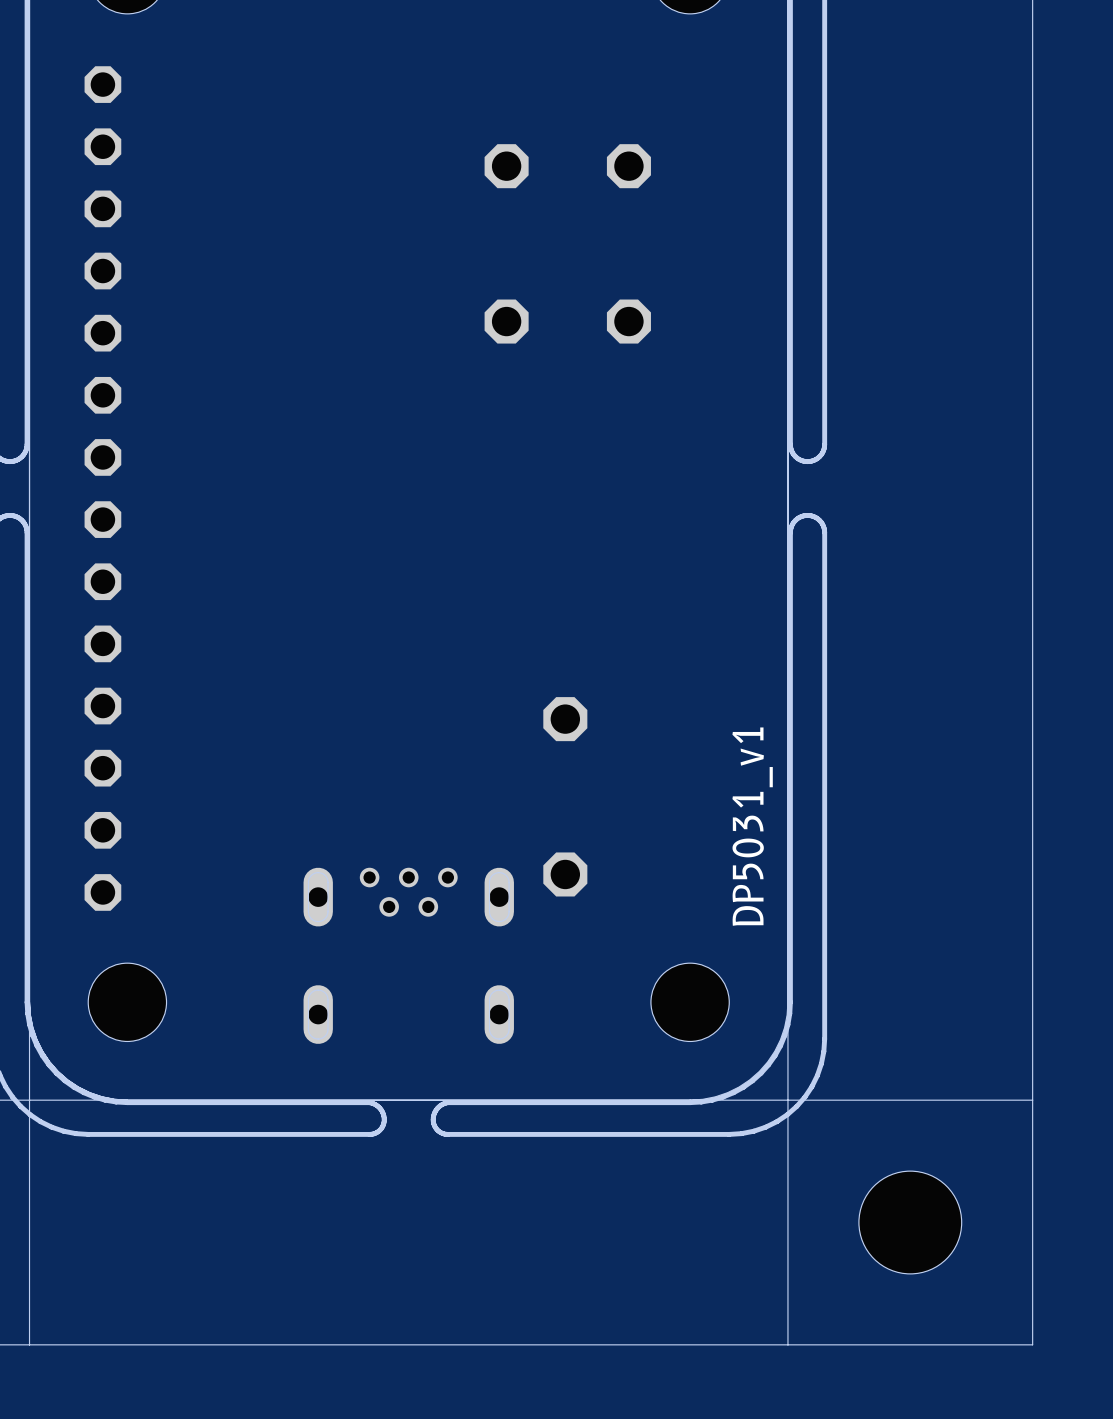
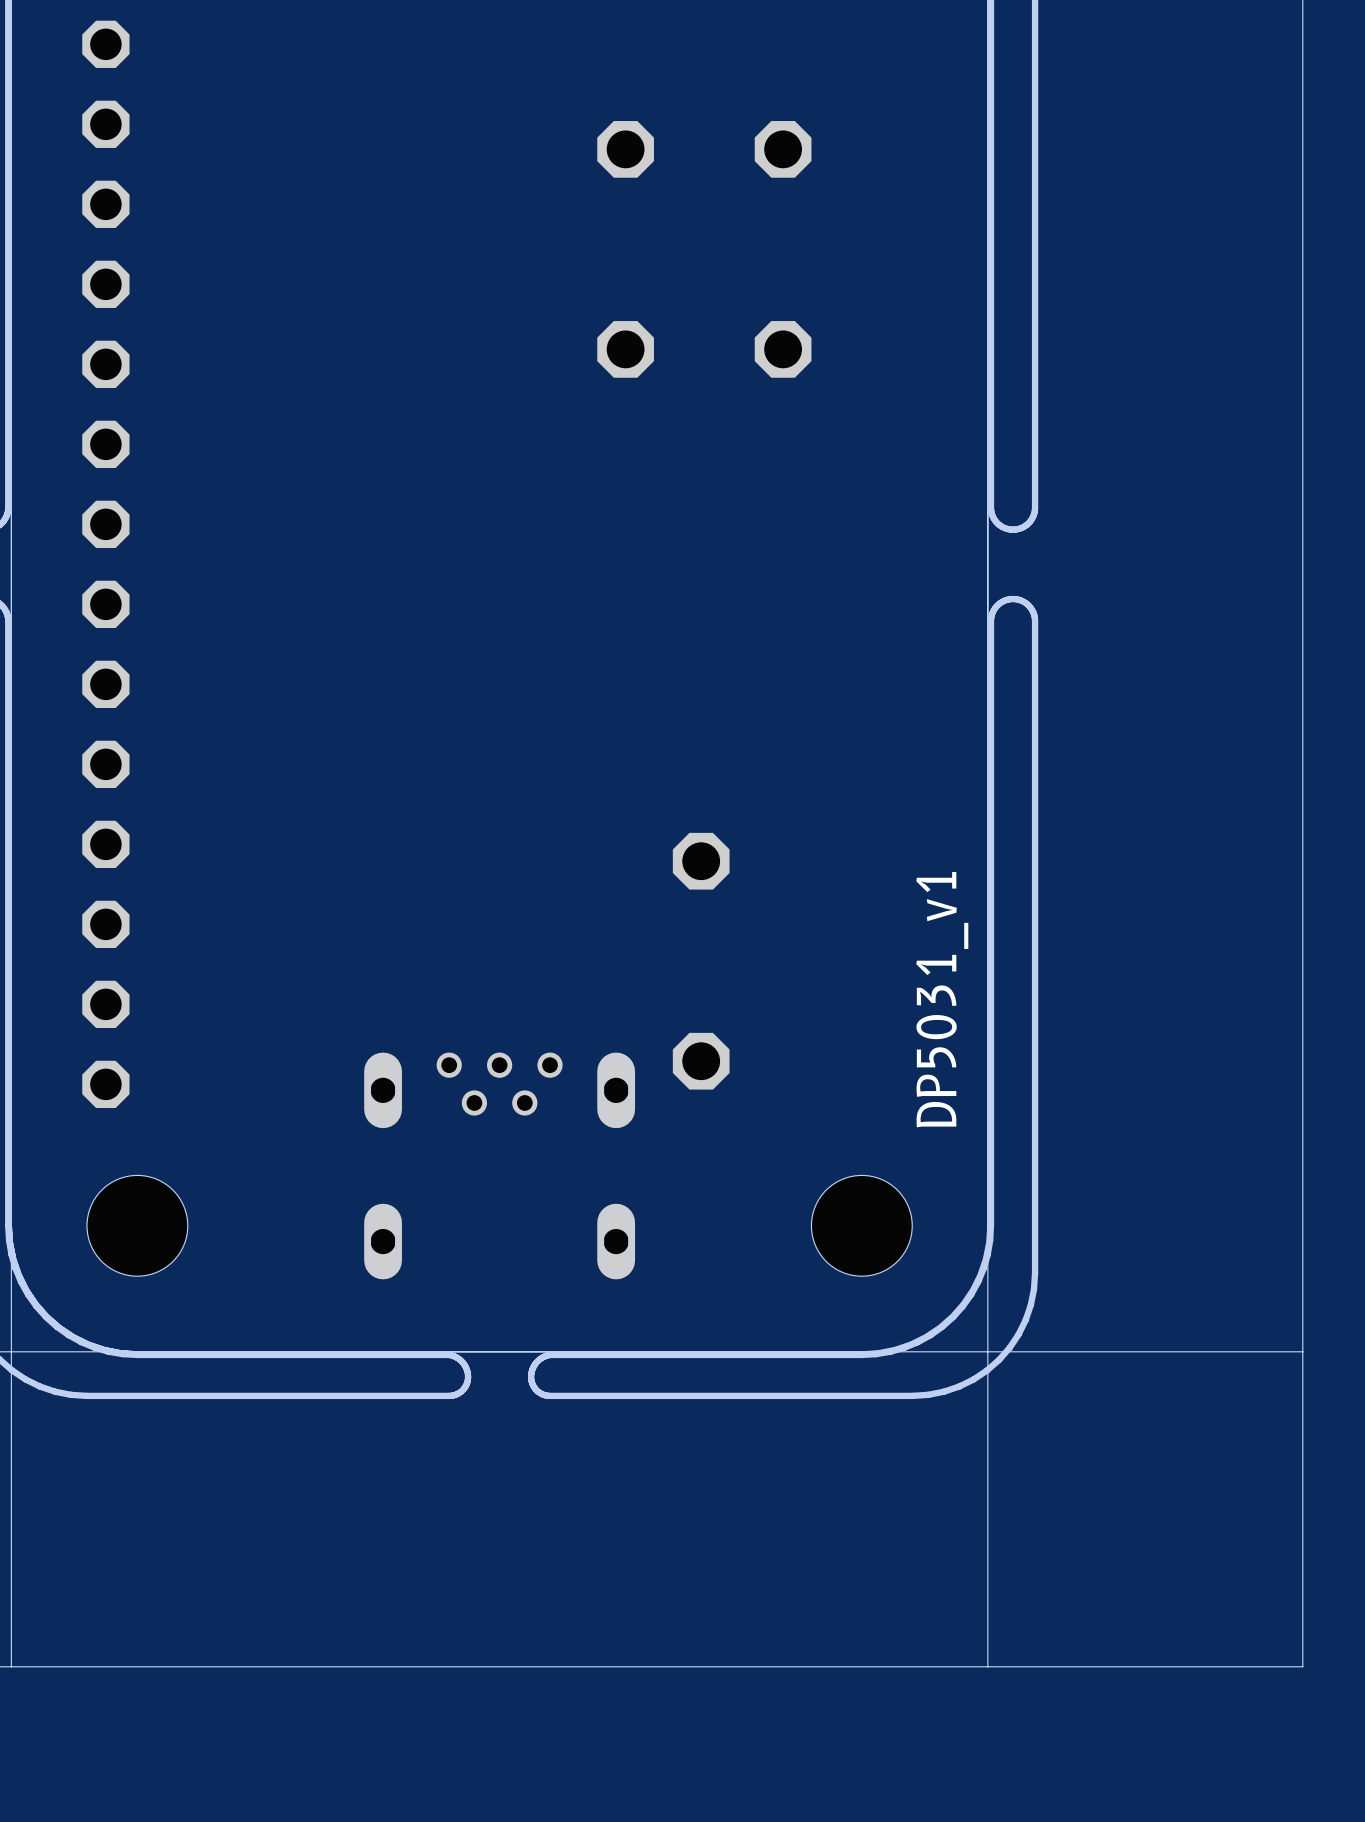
hole: (910, 1222) -> none

